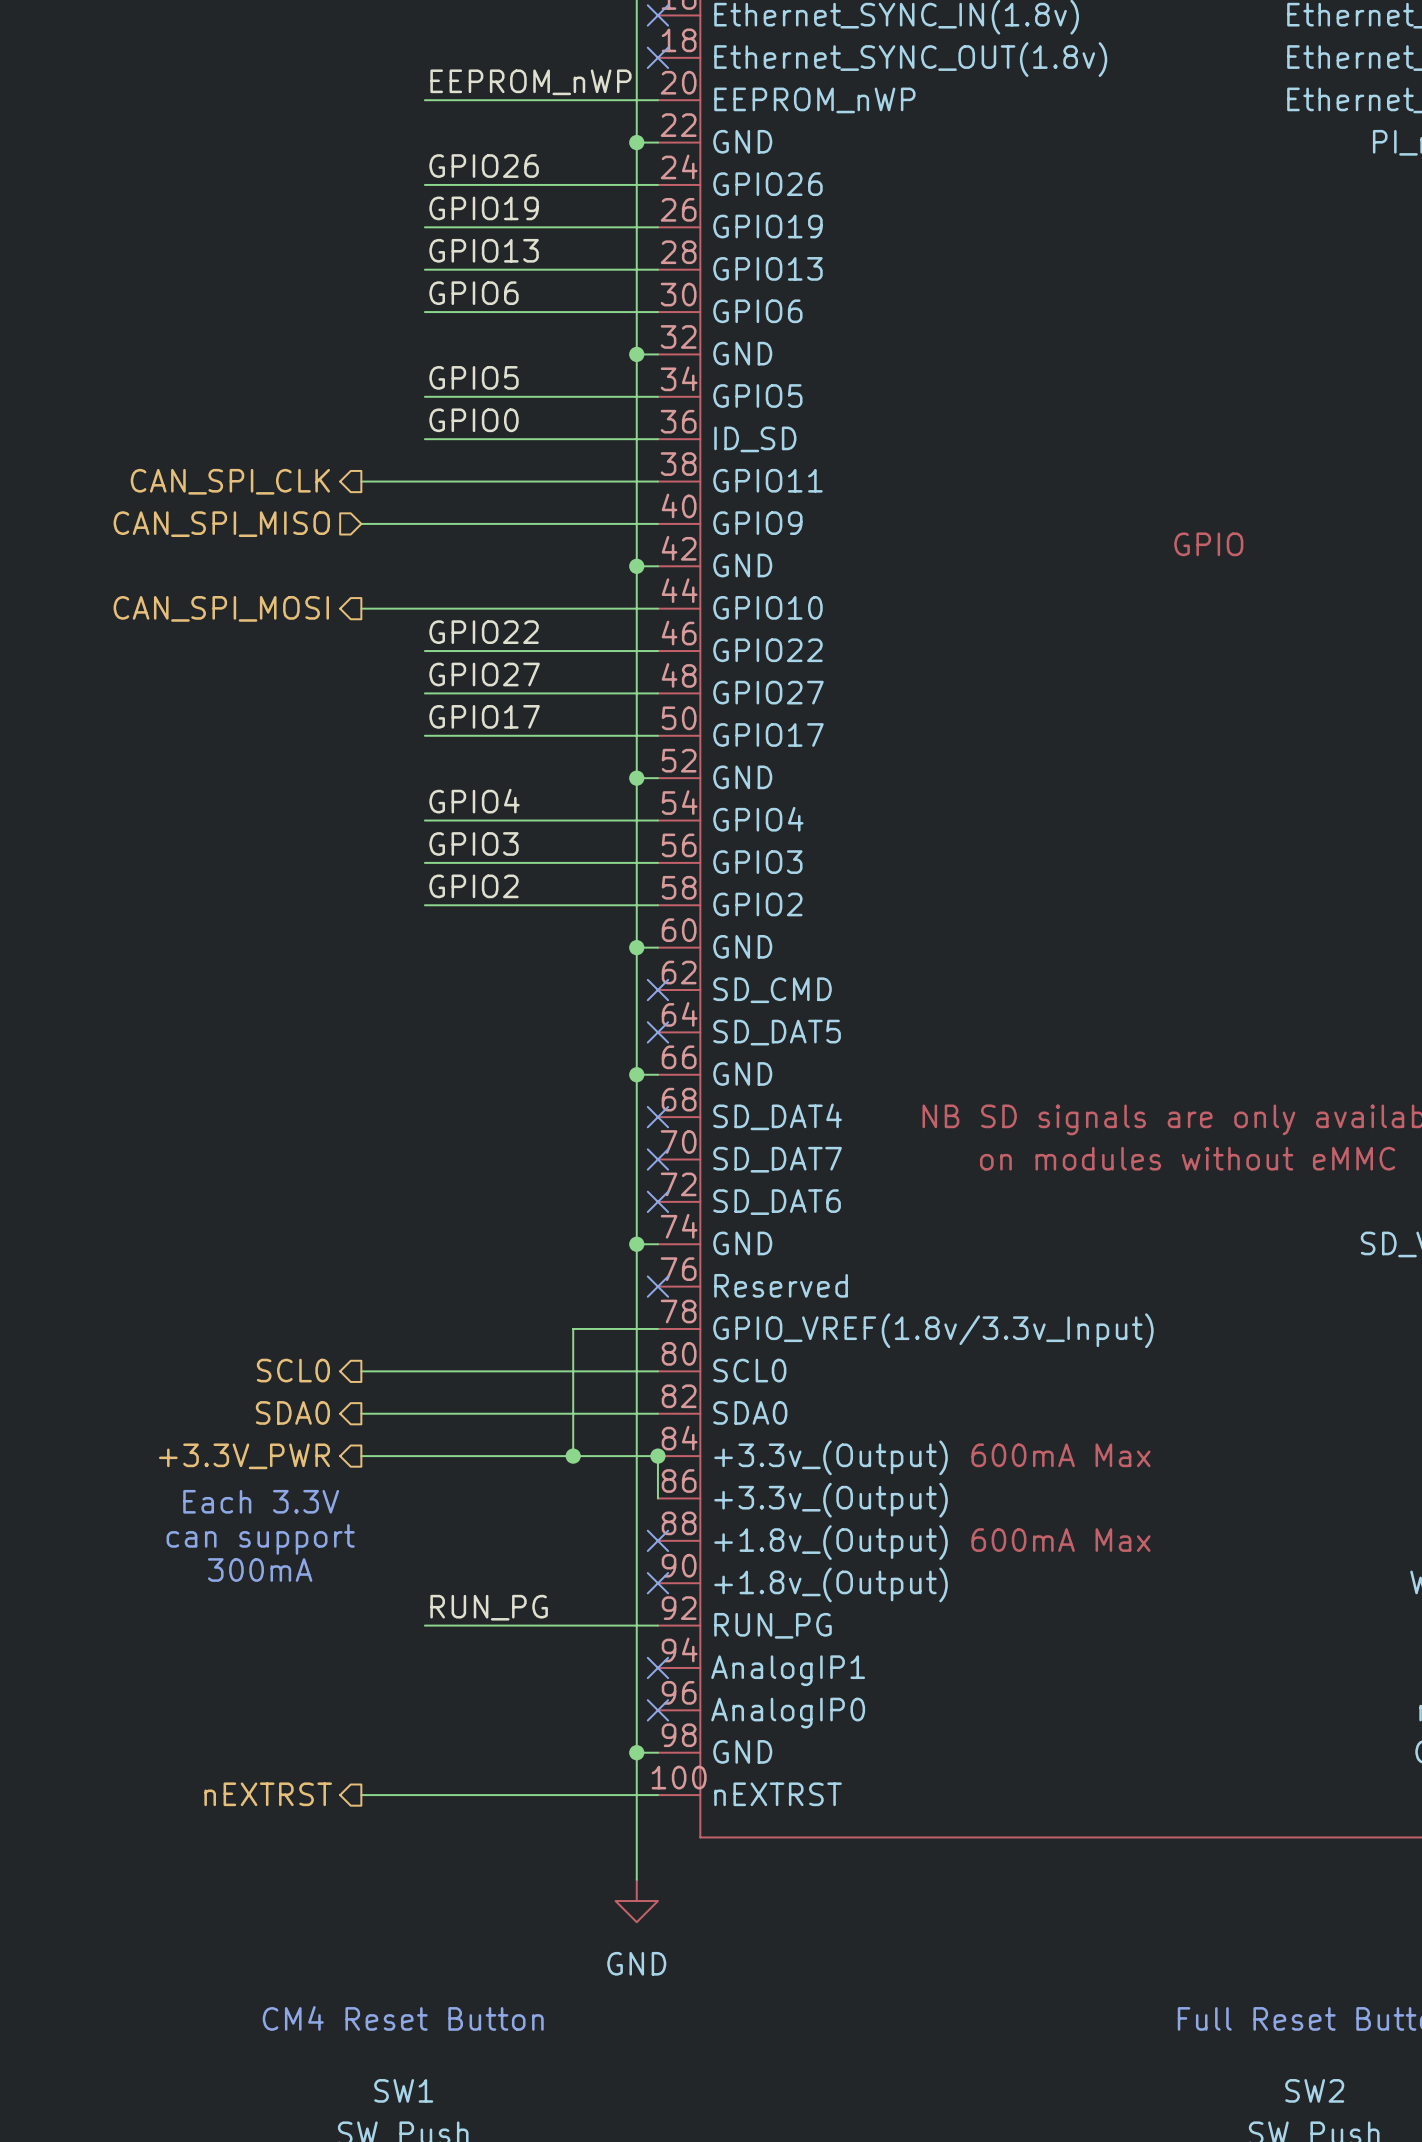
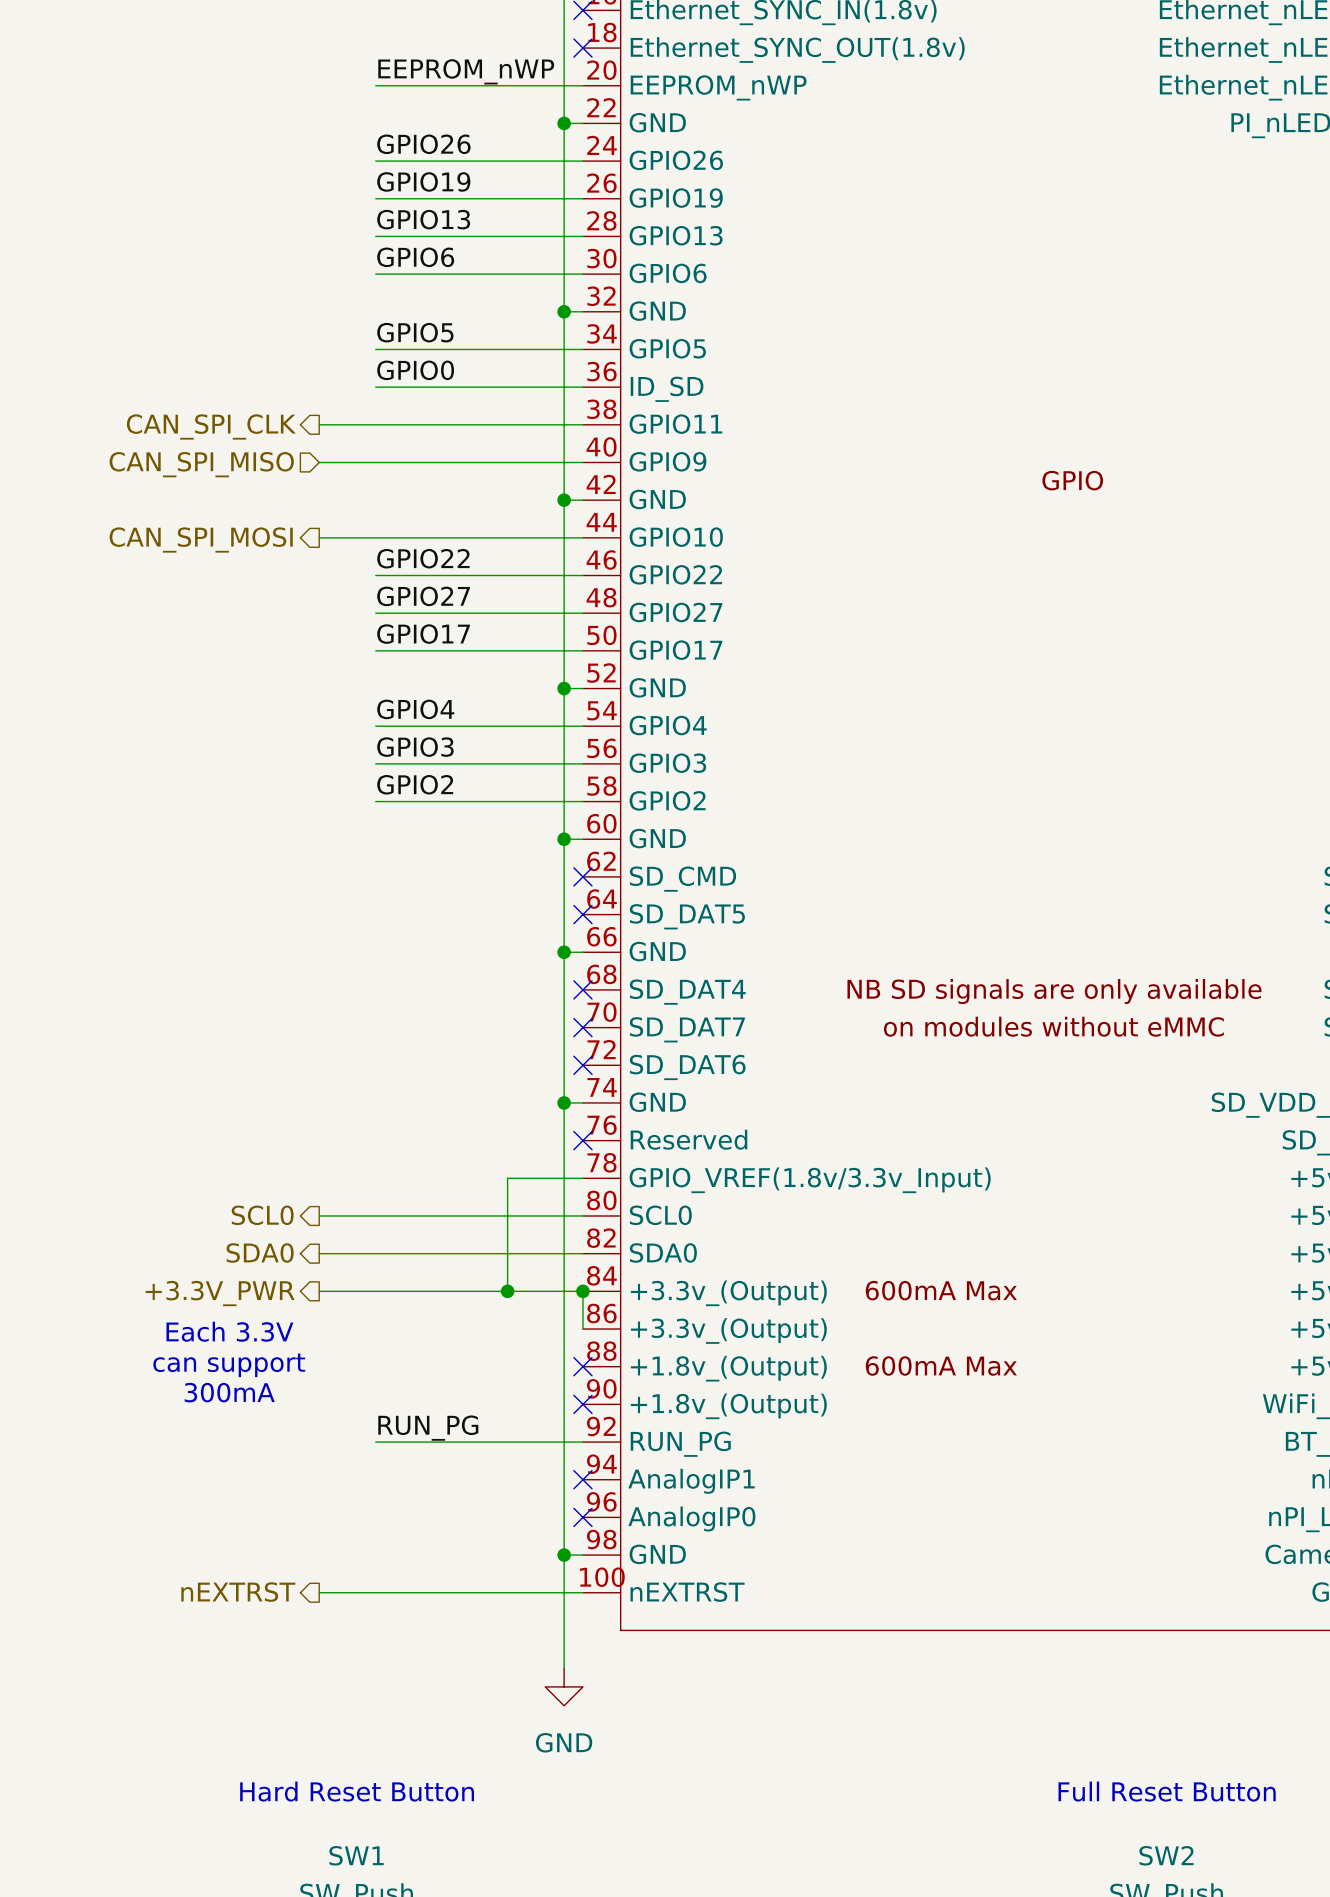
text: CM4 Reset Button (403, 2018) -> Hard Reset Button (357, 1791)

